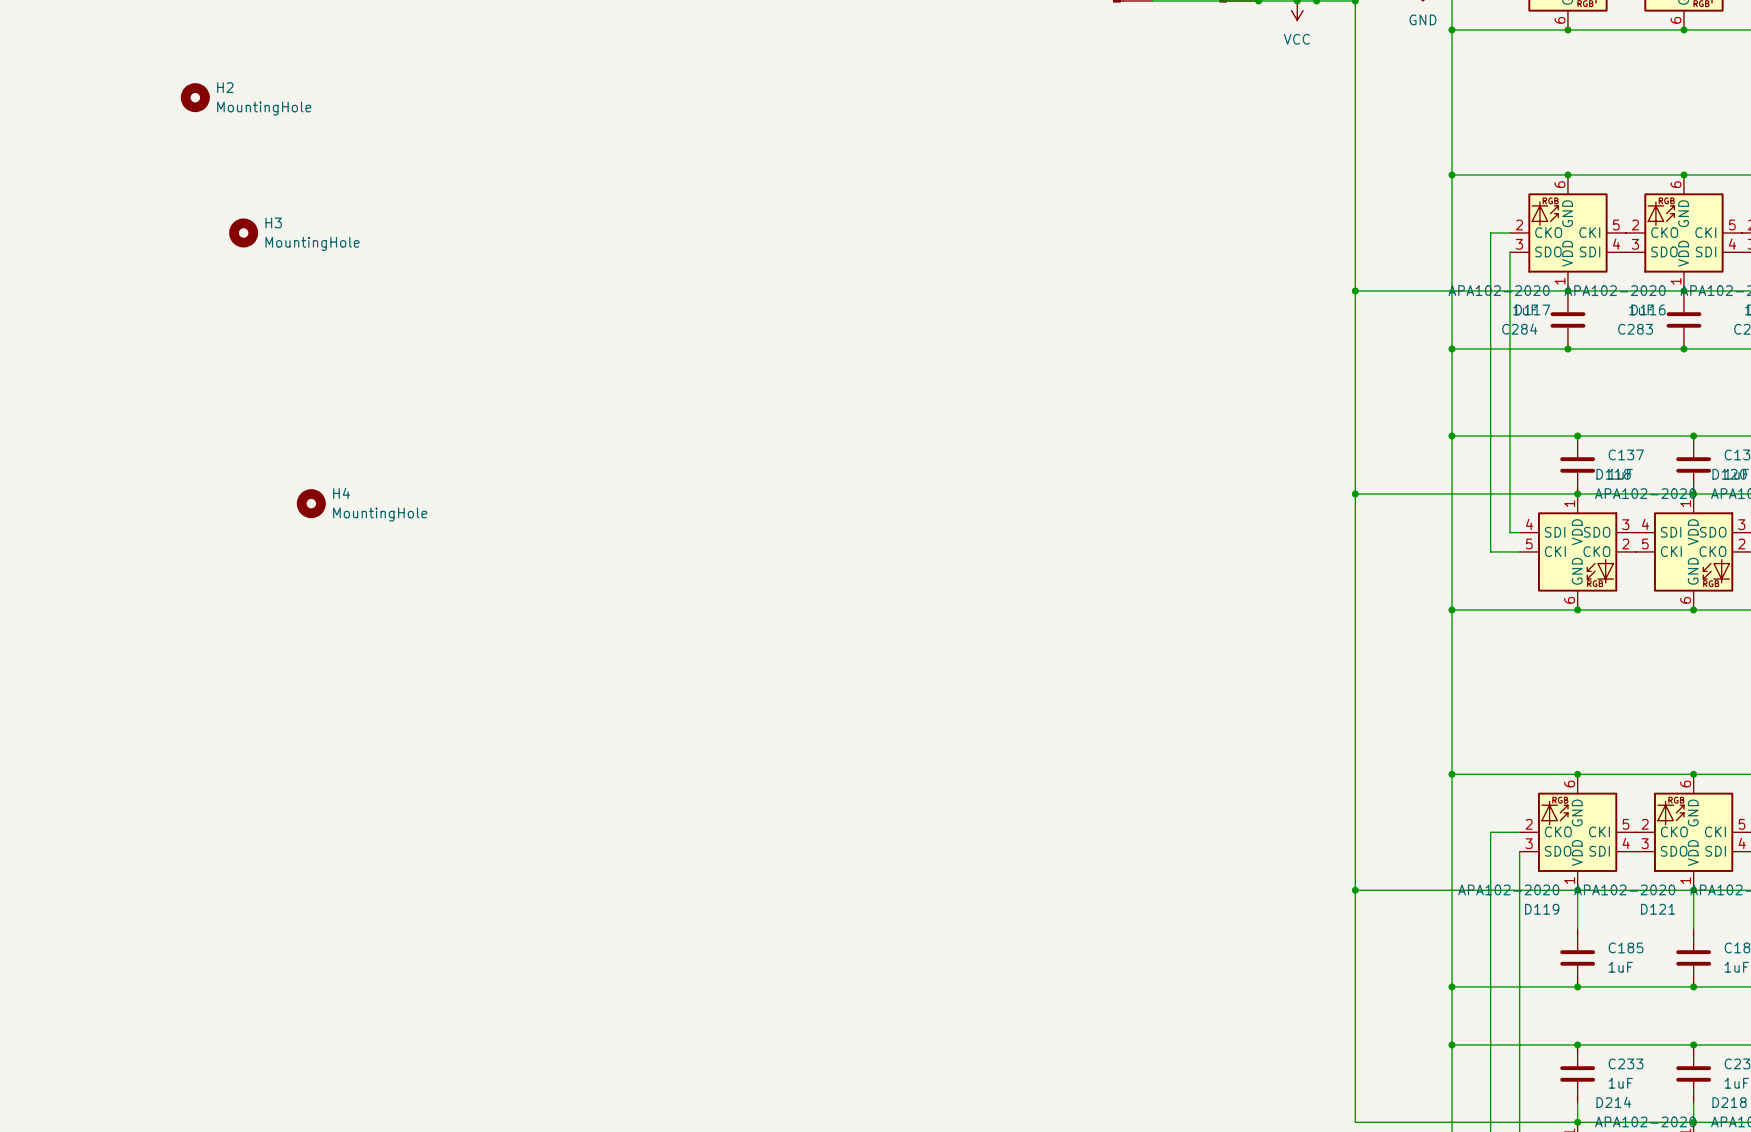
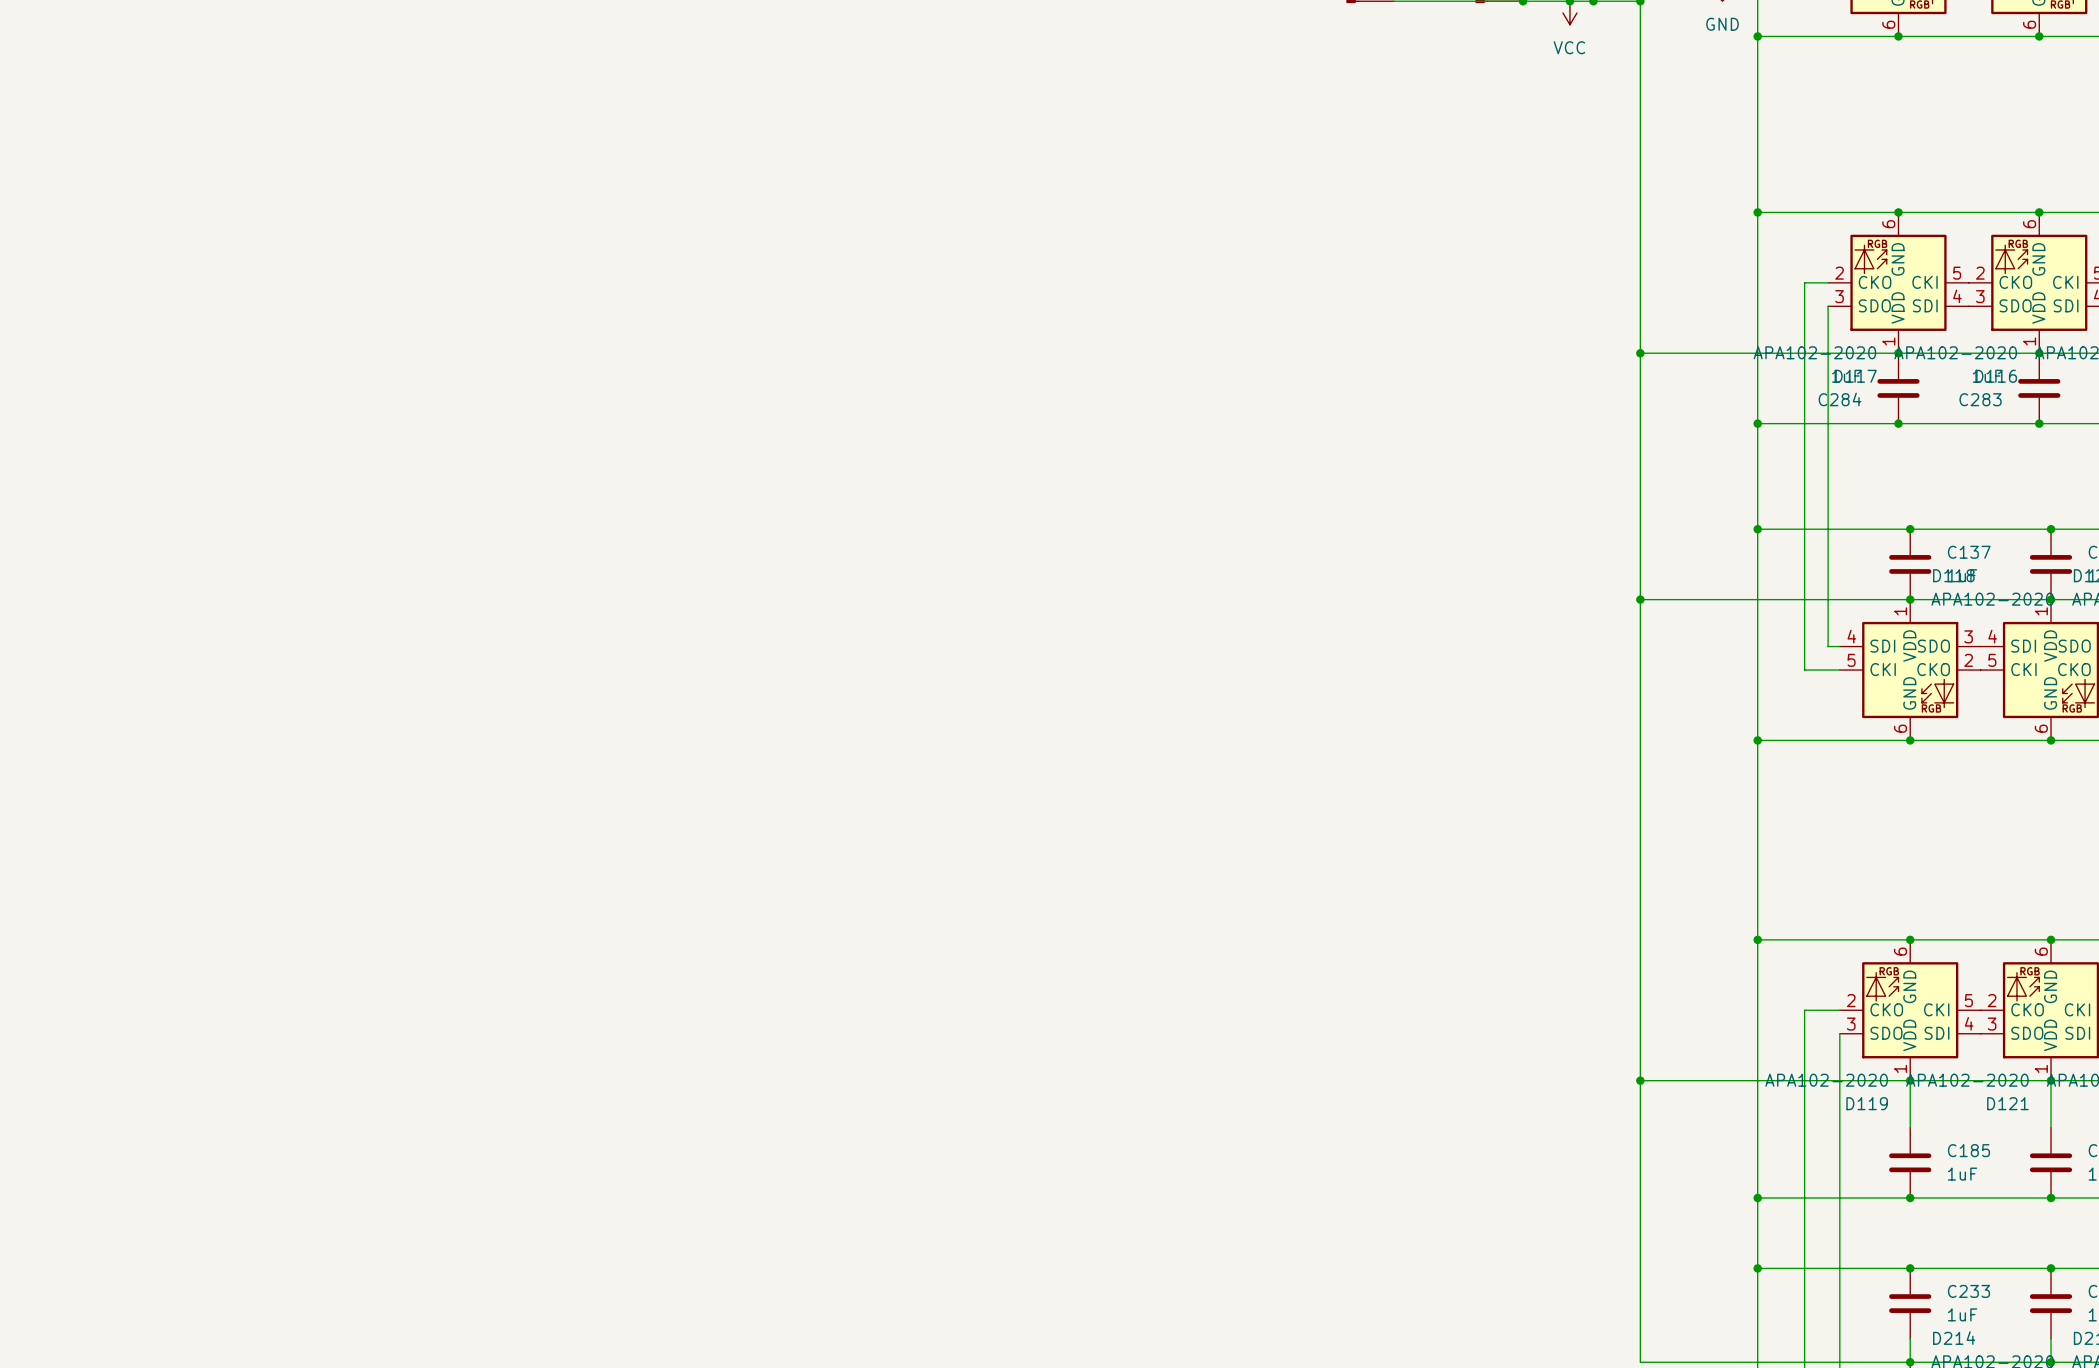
H2: MountingHole (195, 97) -> none
H3: MountingHole (243, 232) -> none
H4: MountingHole (311, 503) -> none

